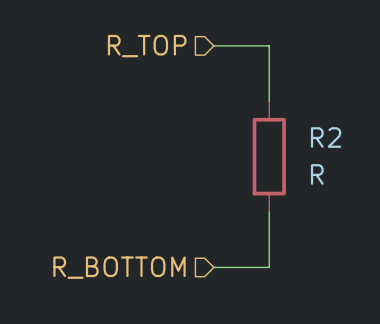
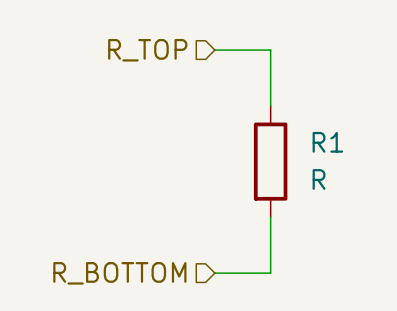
R2 name: R2 (326, 137) -> R1 (327, 142)

